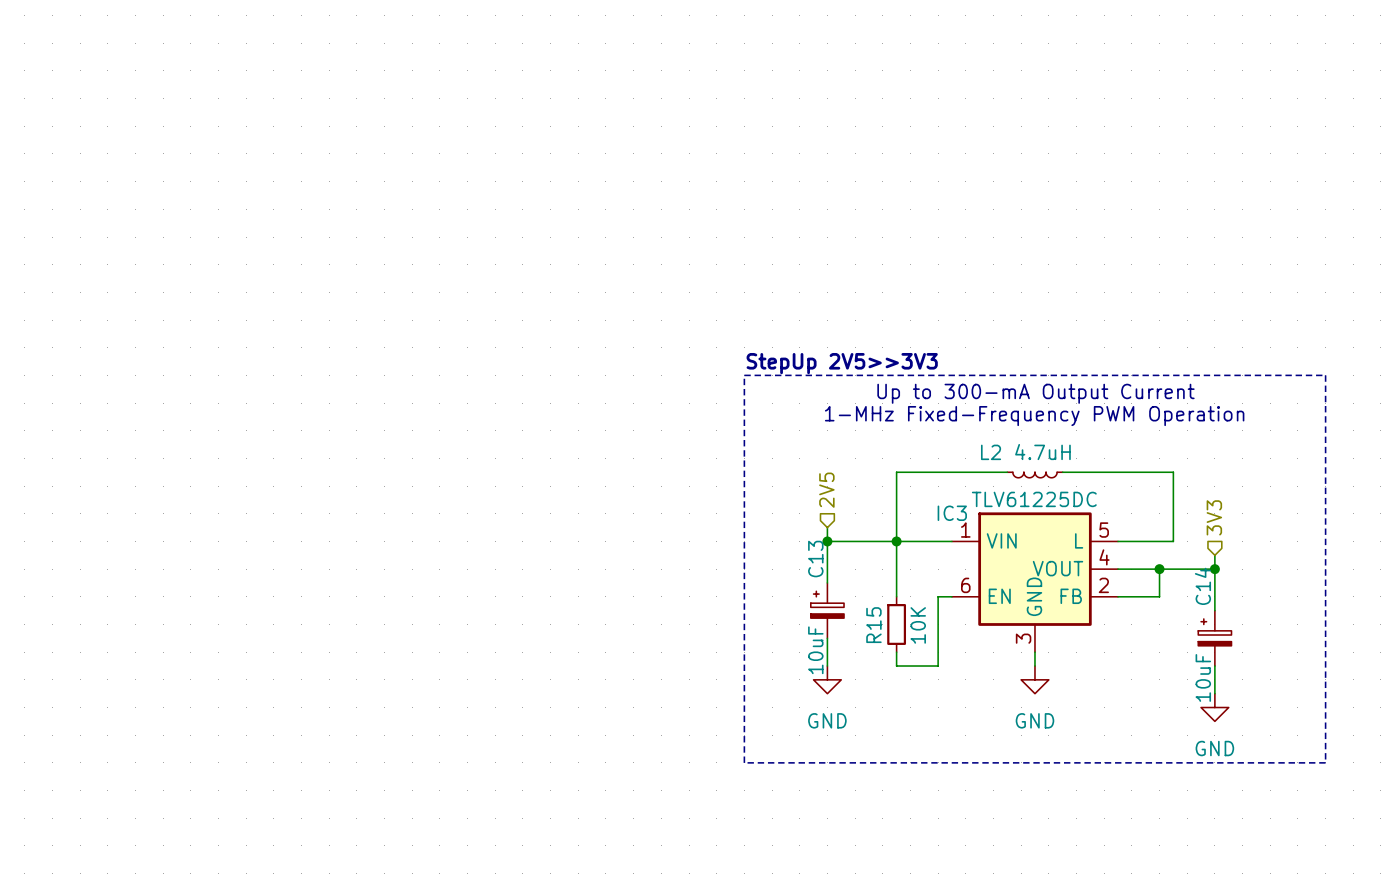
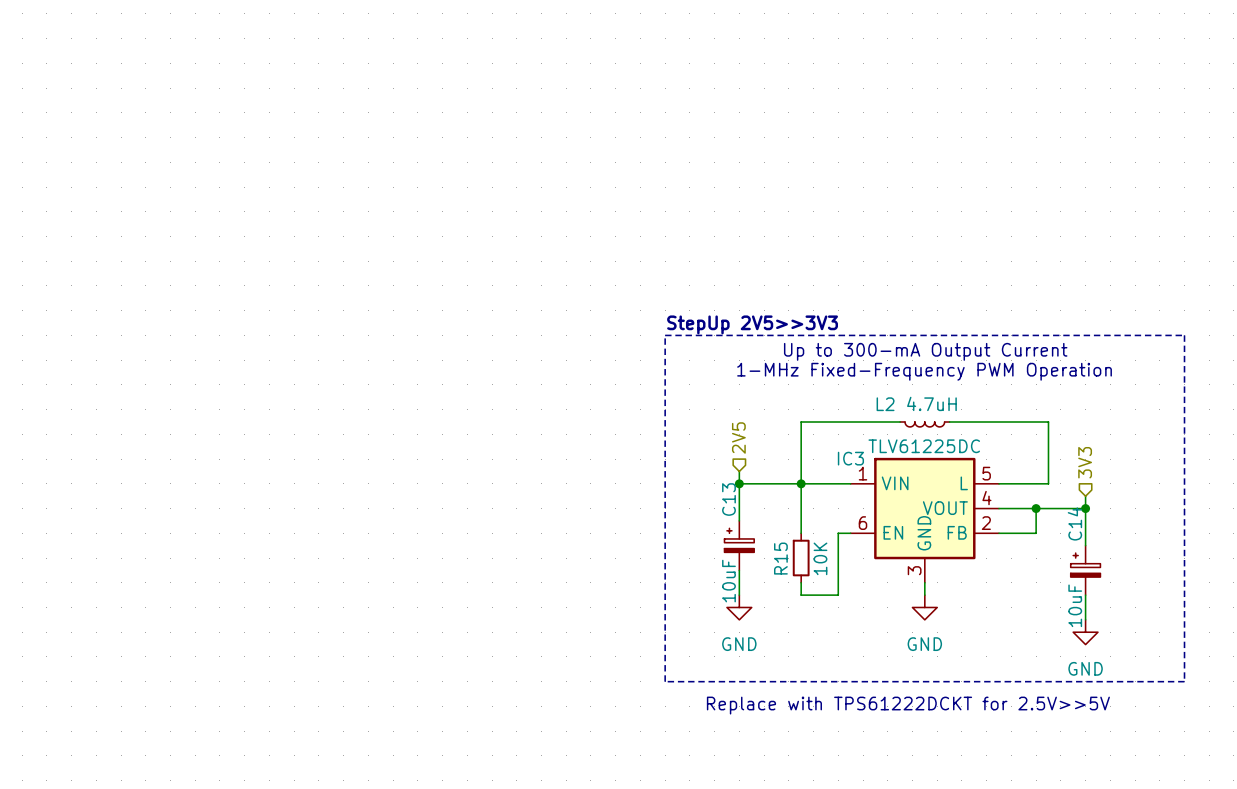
text: none -> Replace with TPS61222DCKT for 2.5V>>5V (908, 705)

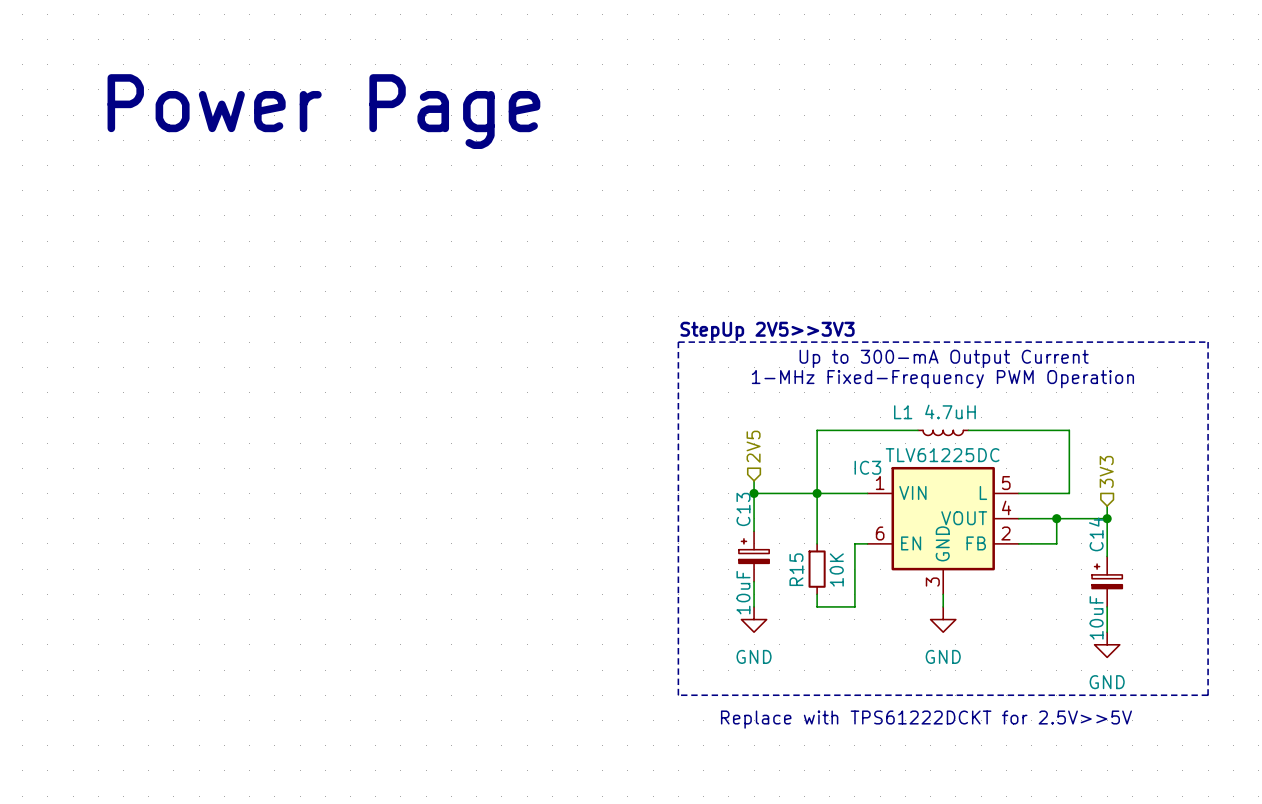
text: none -> Power Page (323, 111)
L2 name: L2 (885, 404) -> L1 (903, 412)

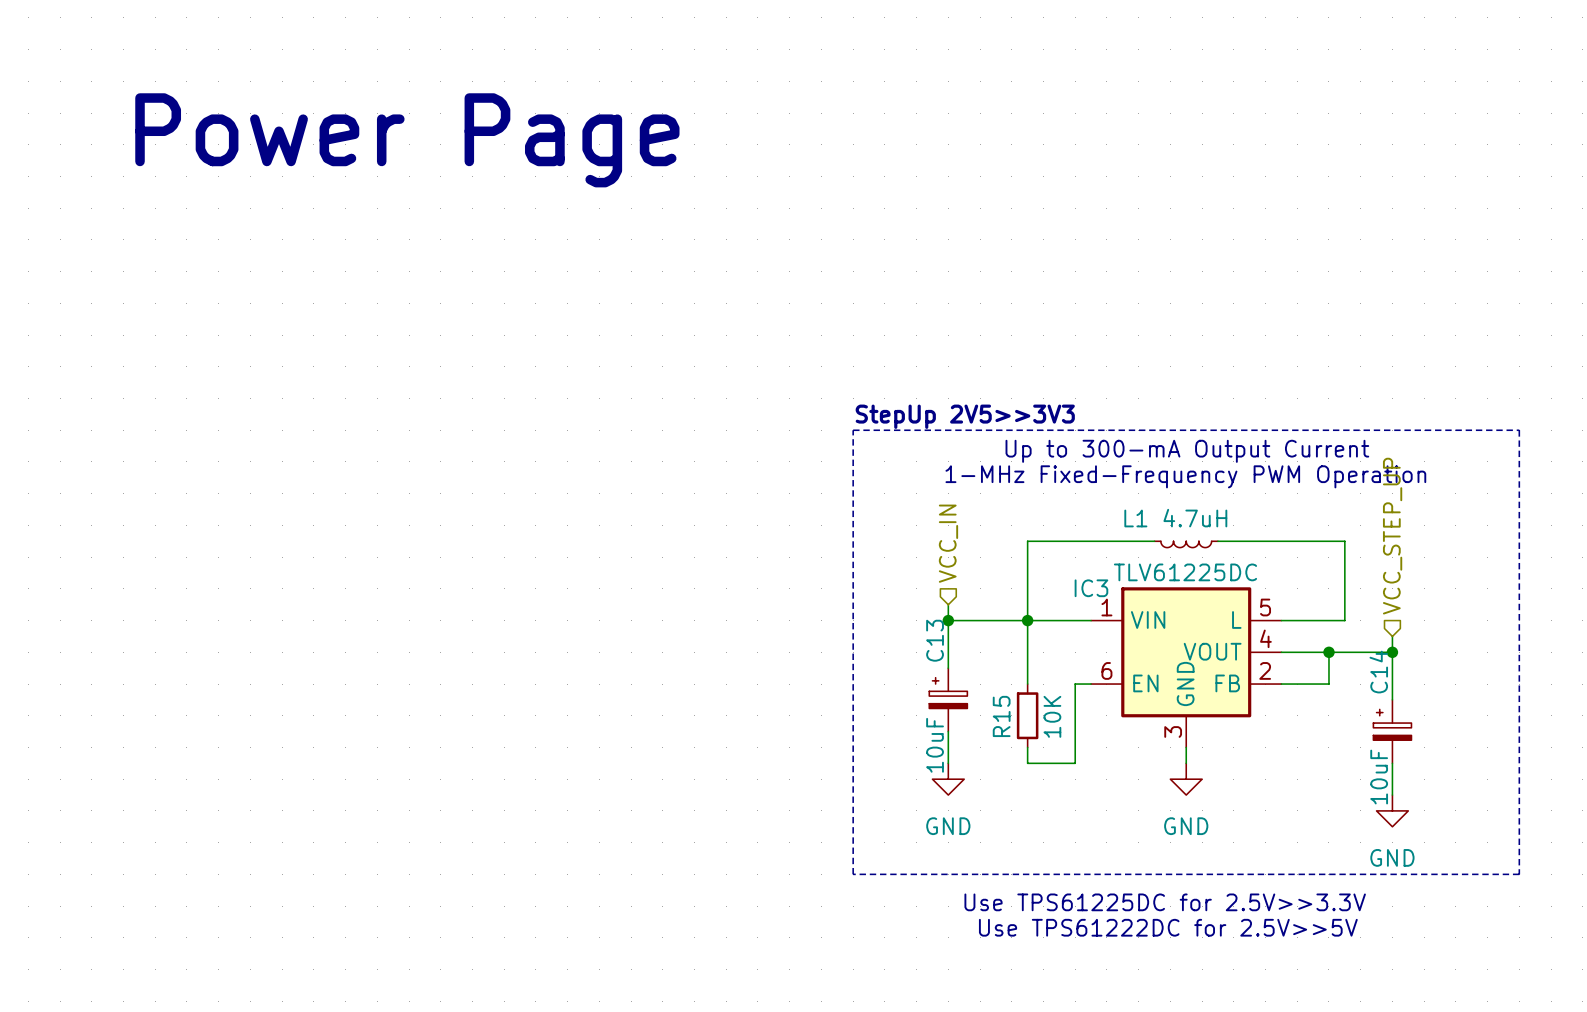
hierarchical label: 2V5 (753, 446) -> VCC_IN (948, 543)
hierarchical label: 3V3 (1106, 471) -> VCC_STEP_UP (1392, 536)
text: Replace with TPS61222DCKT for 2.5V>>5V (926, 719) -> Use TPS61225DC for 2.5V>>3.3V (1165, 902)
text: none -> Use TPS61222DC for 2.5V>>5V (1168, 927)

